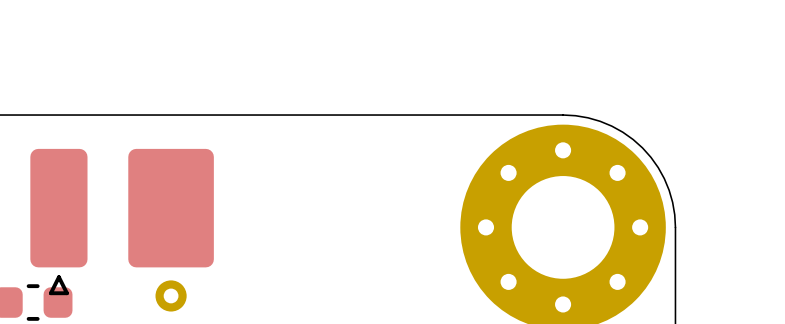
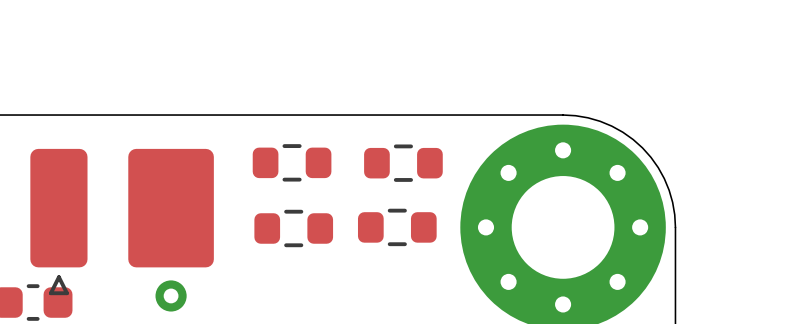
part: none -> (292, 162)
part: none -> (403, 163)
part: none -> (397, 227)
part: none -> (293, 228)

